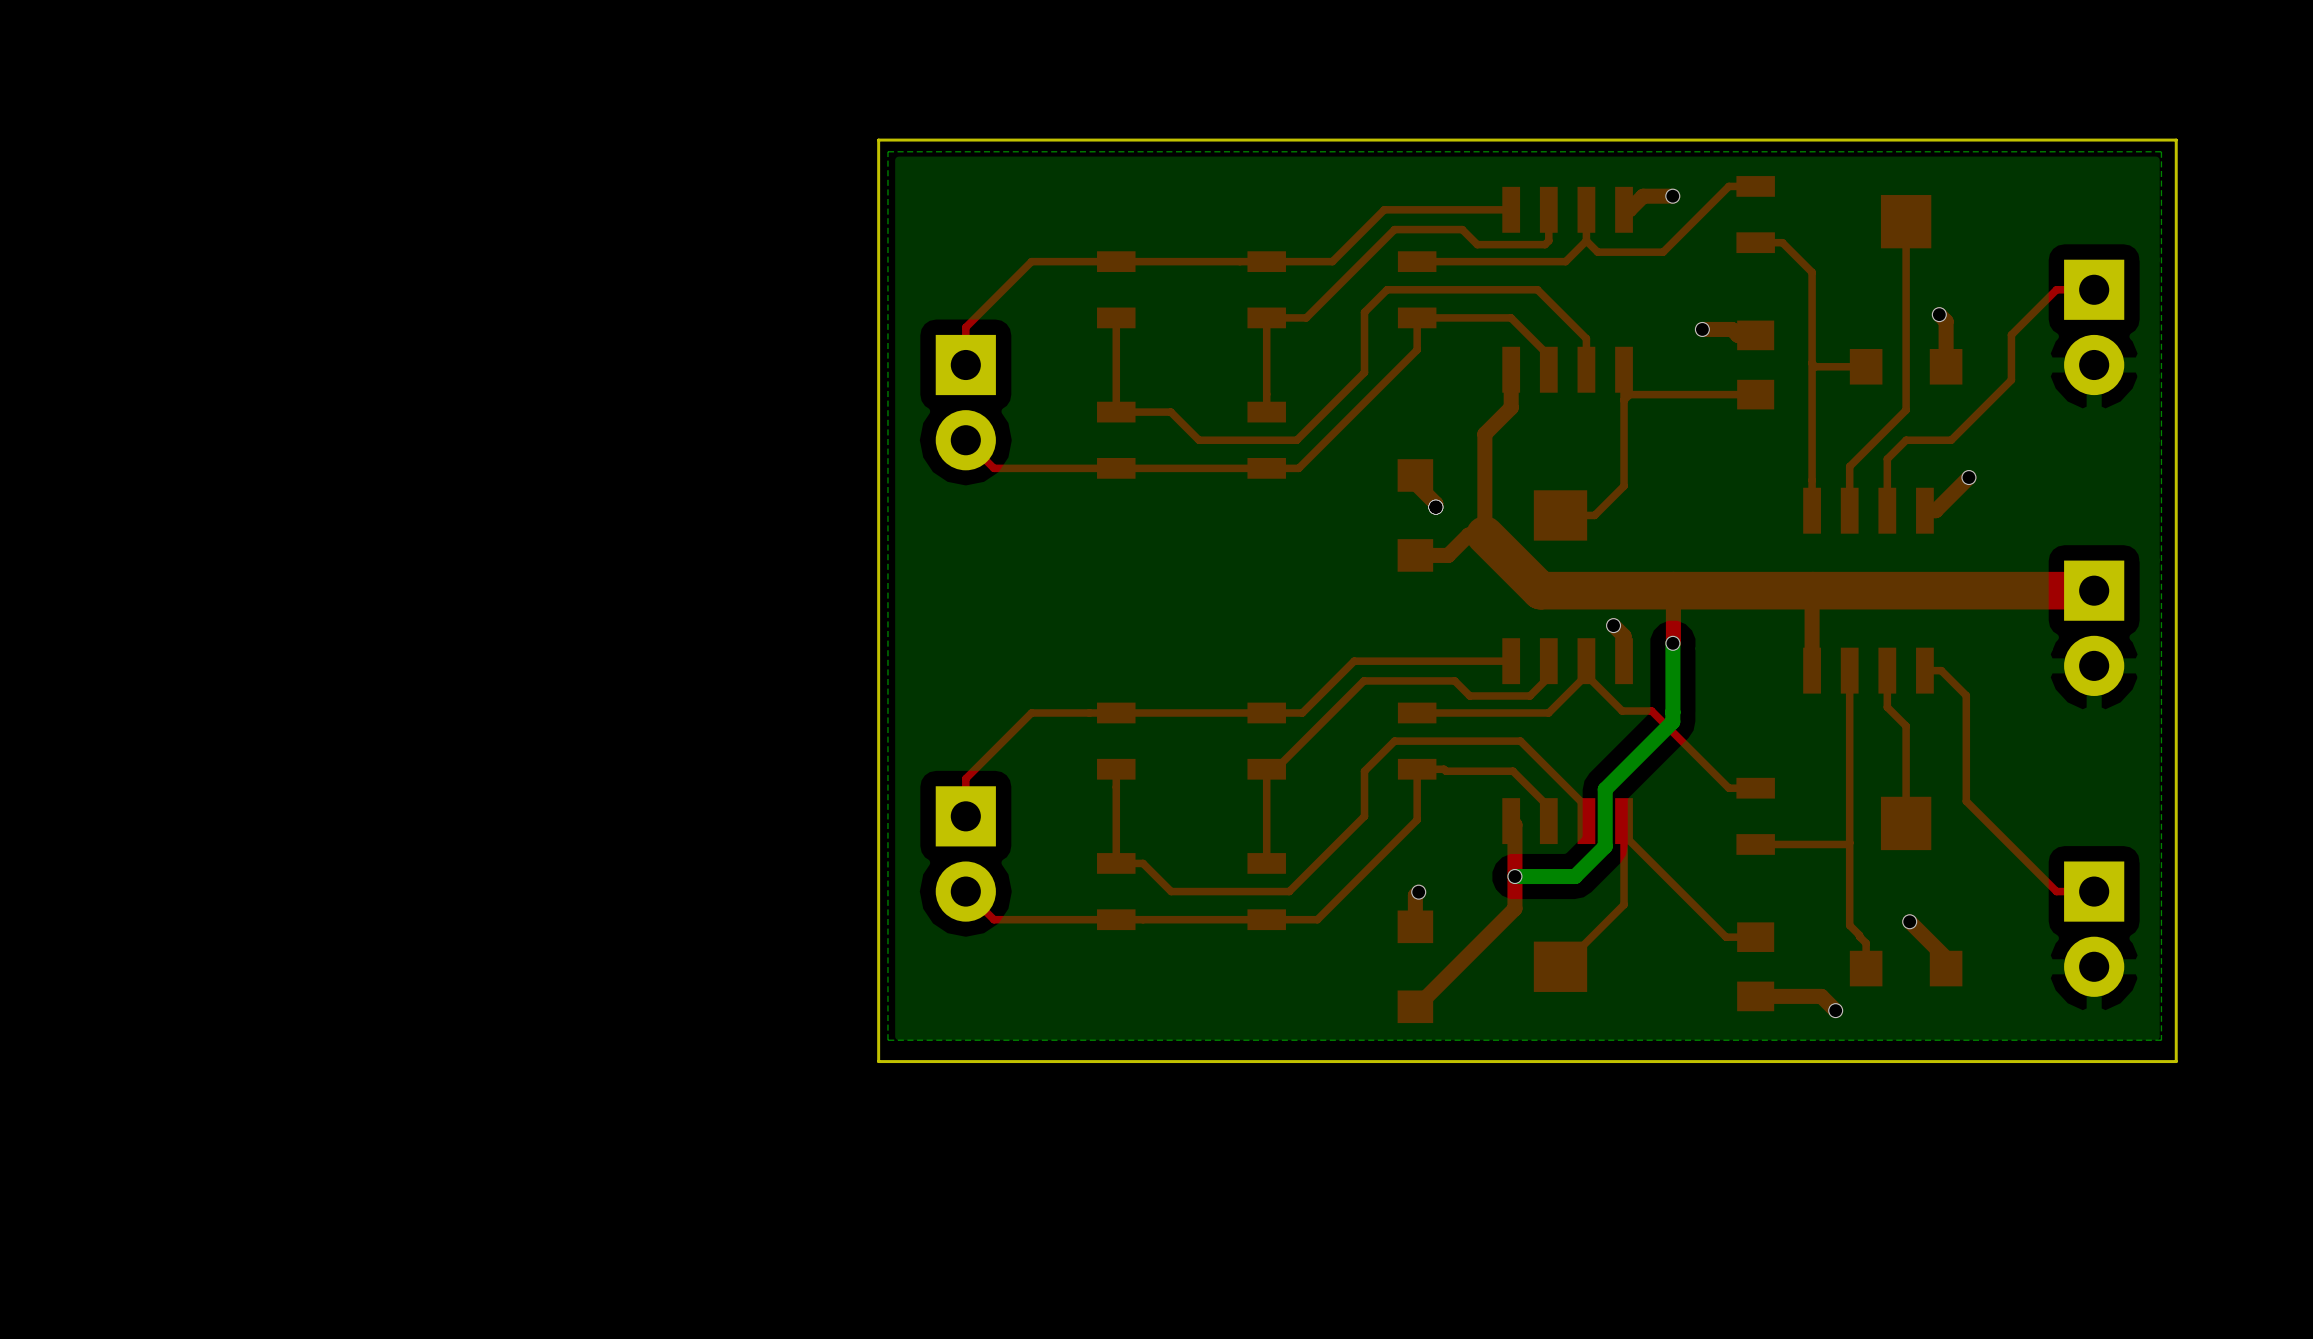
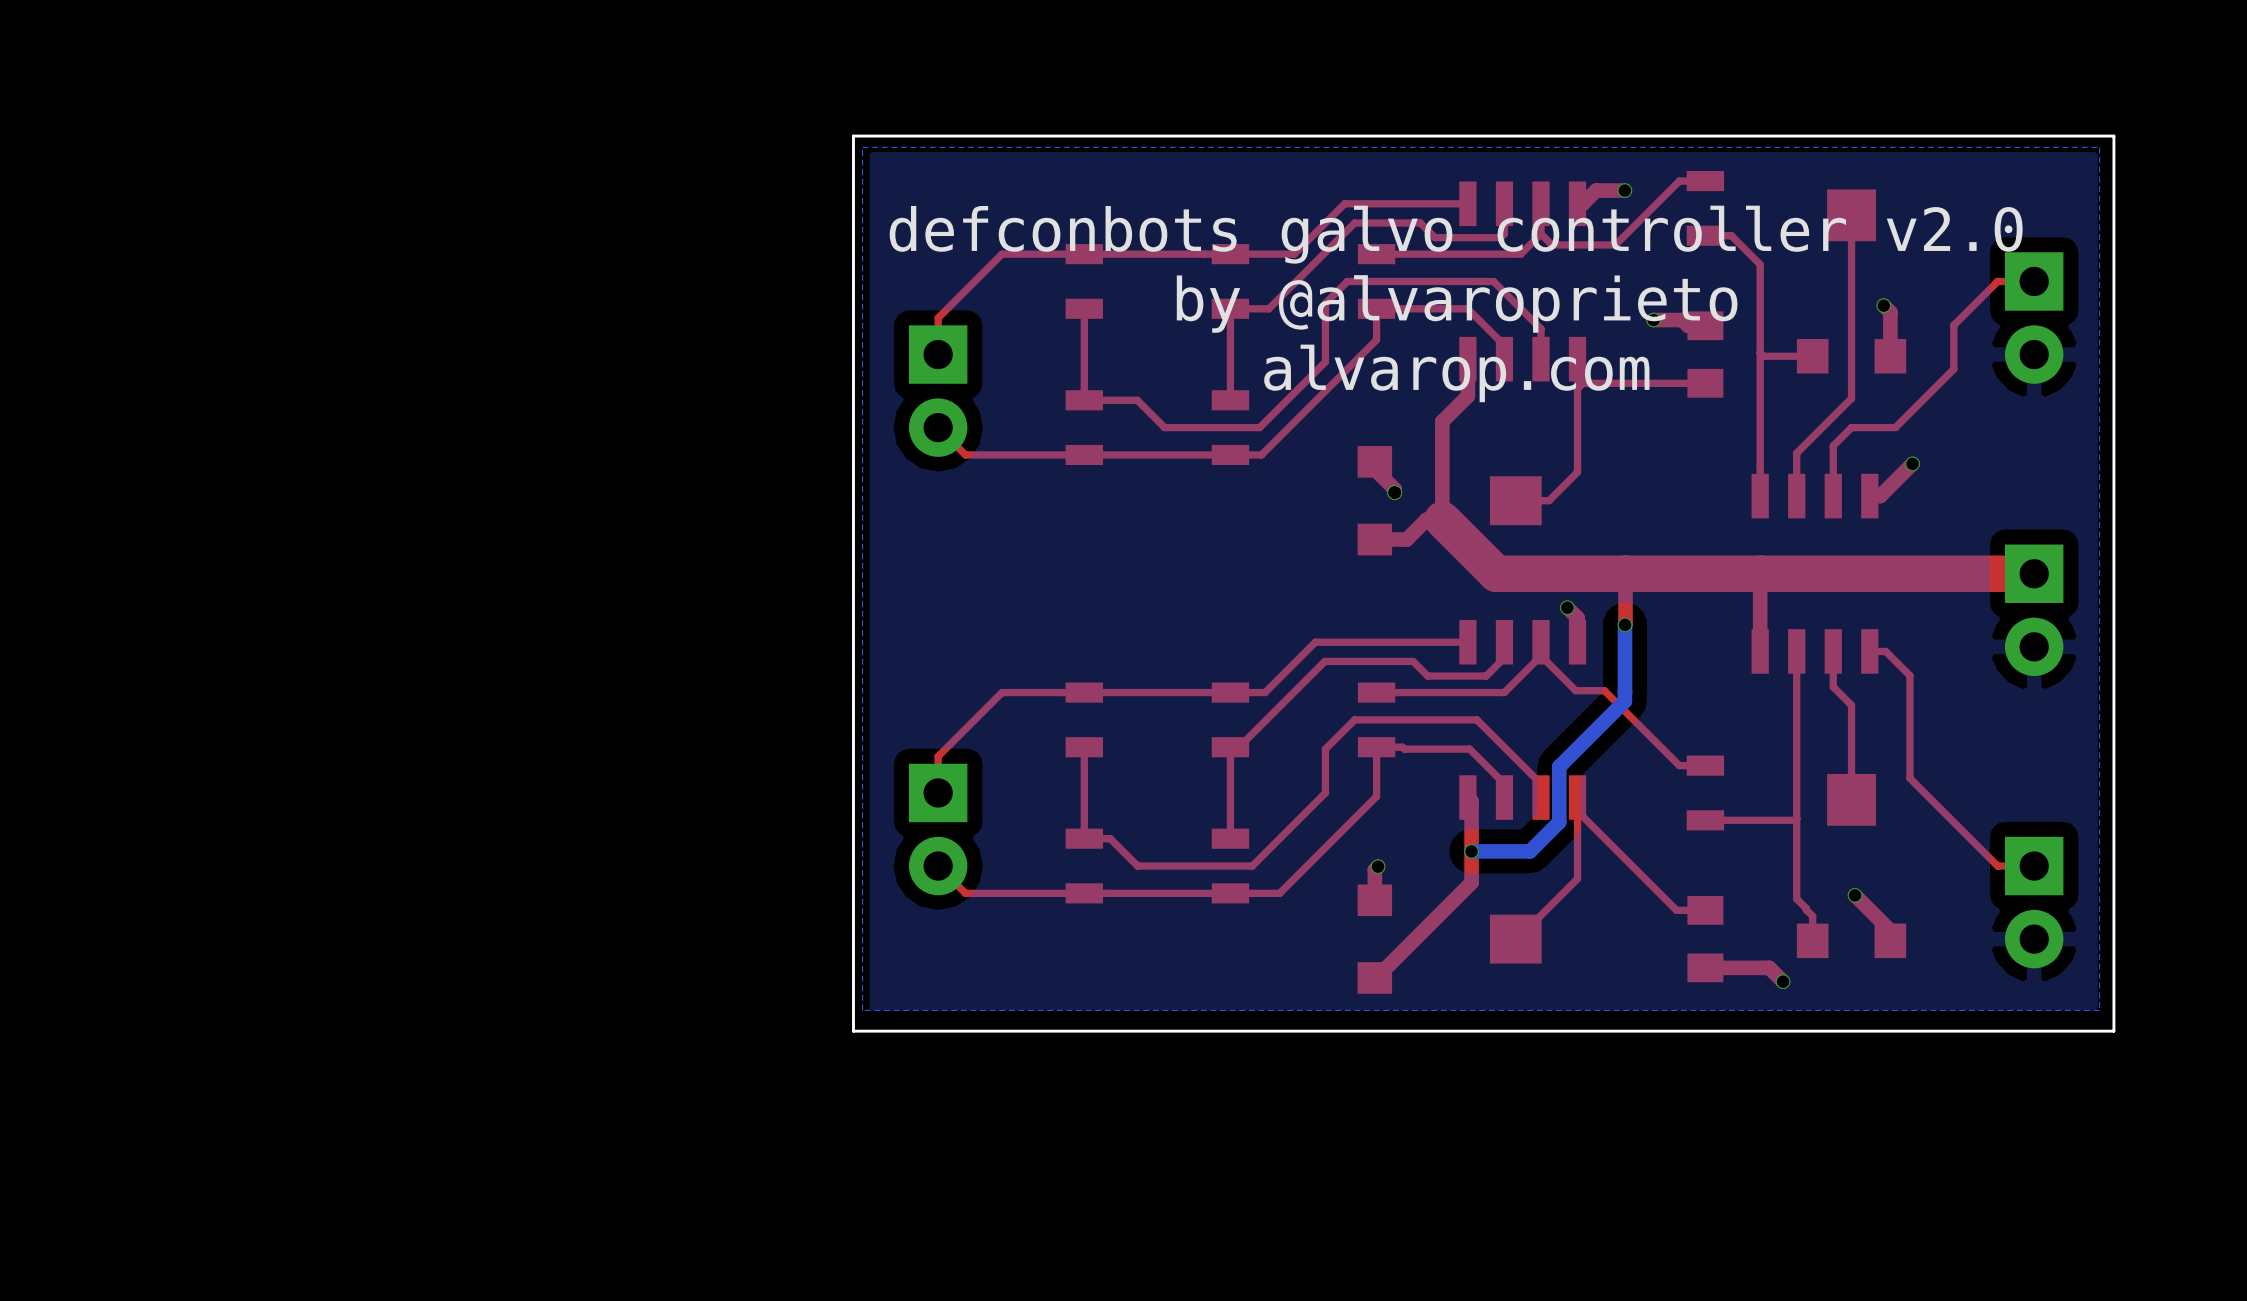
text: none -> defconbots galvo controller v2.0 (1456, 234)
text: none -> by @alvaroprieto (1457, 303)
text: none -> alvarop.com (1456, 373)

